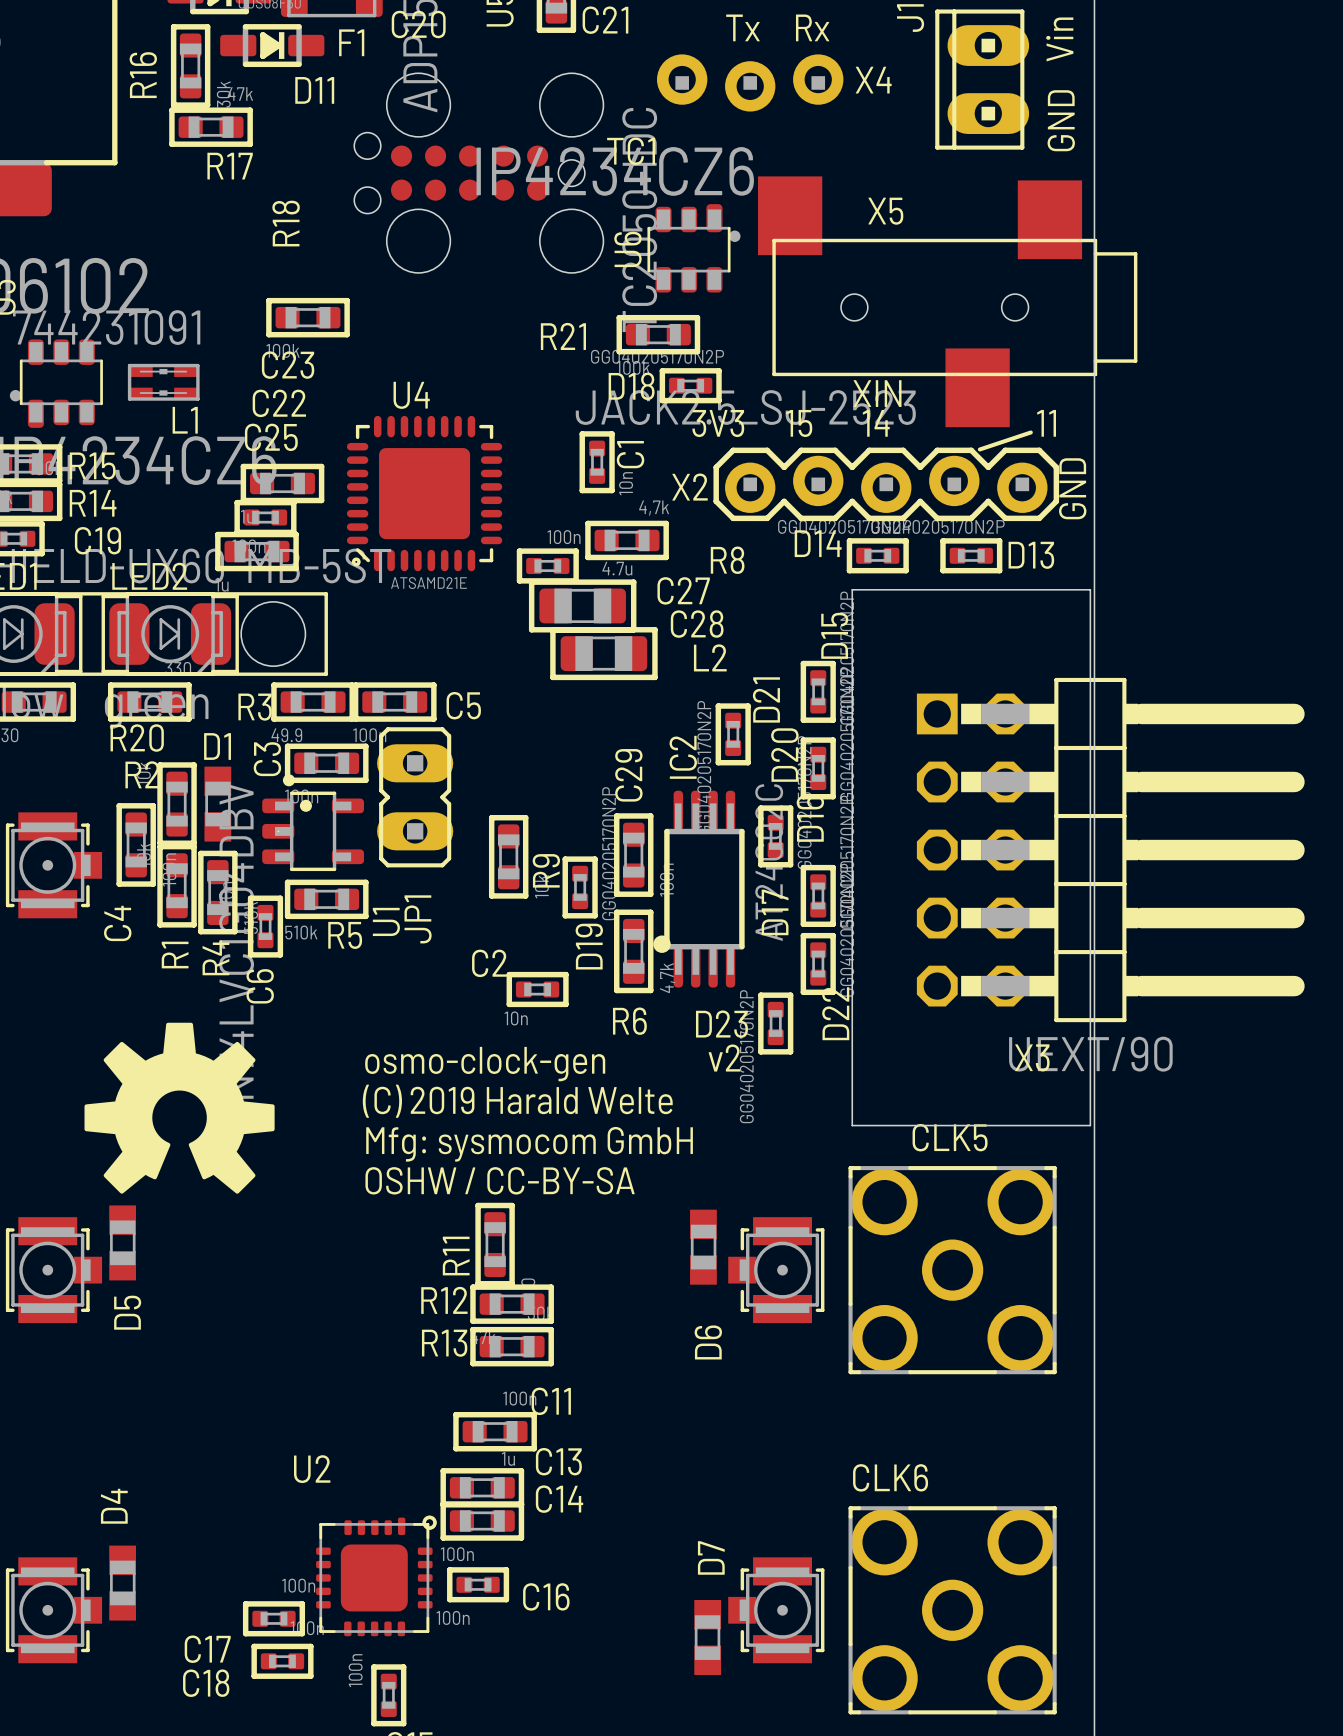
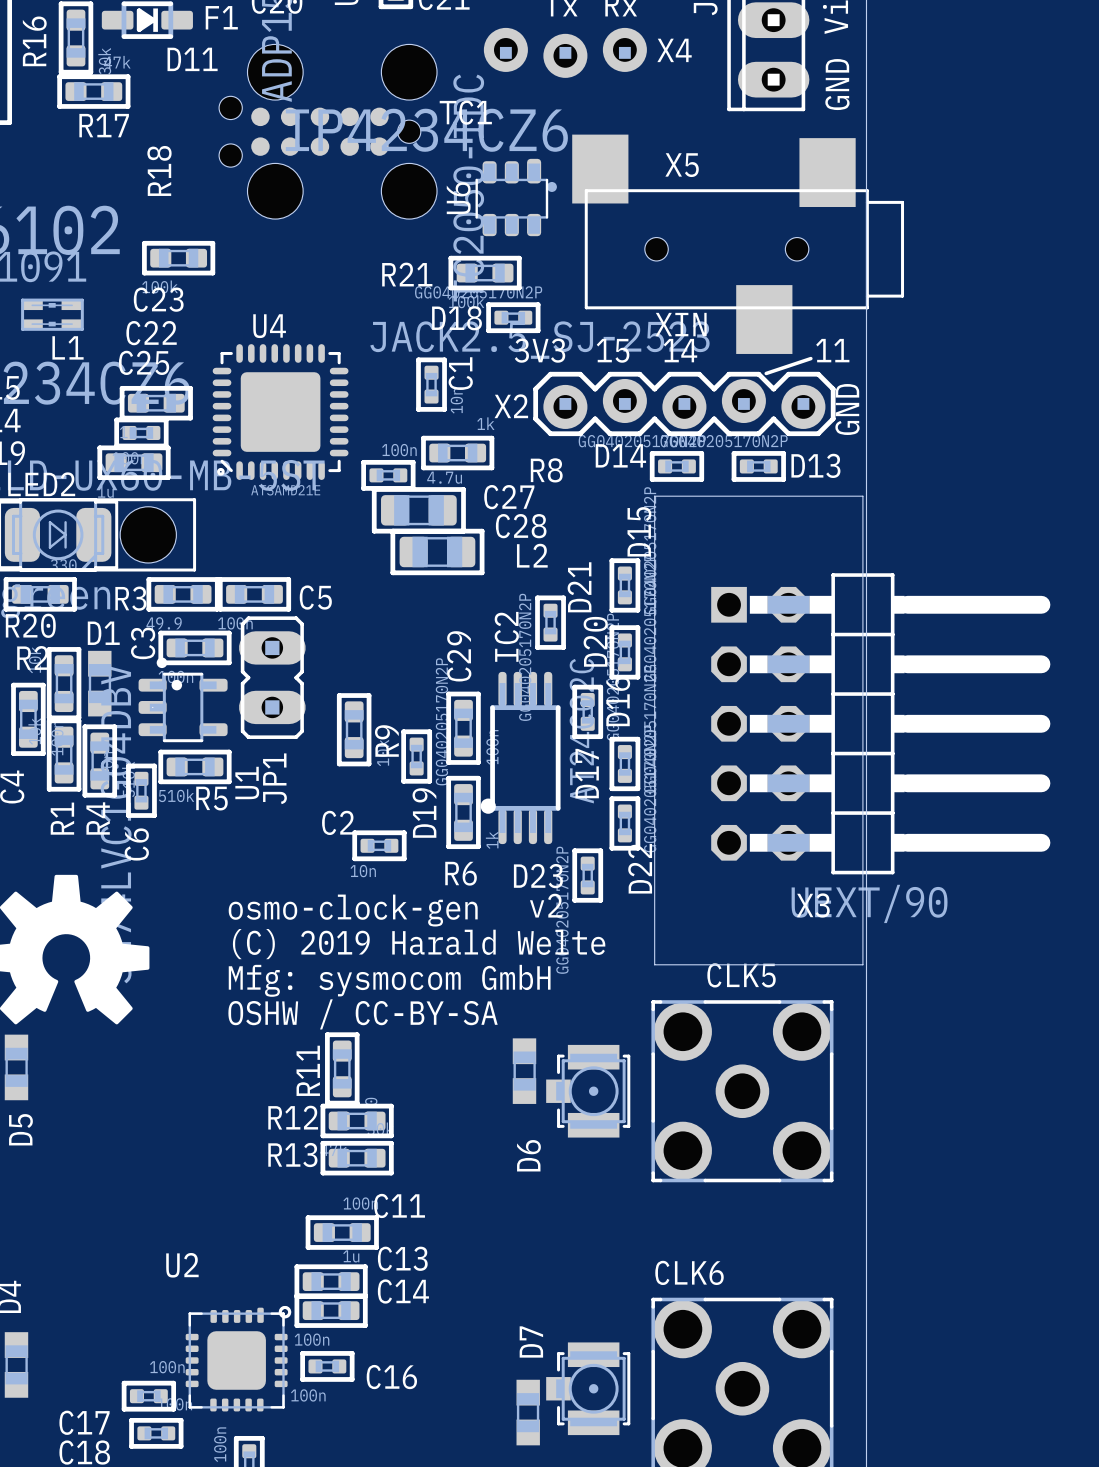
R8 value: 4,7k (654, 508) -> 1k (485, 423)
R6 value: 4,7k (667, 978) -> 1k (492, 840)

